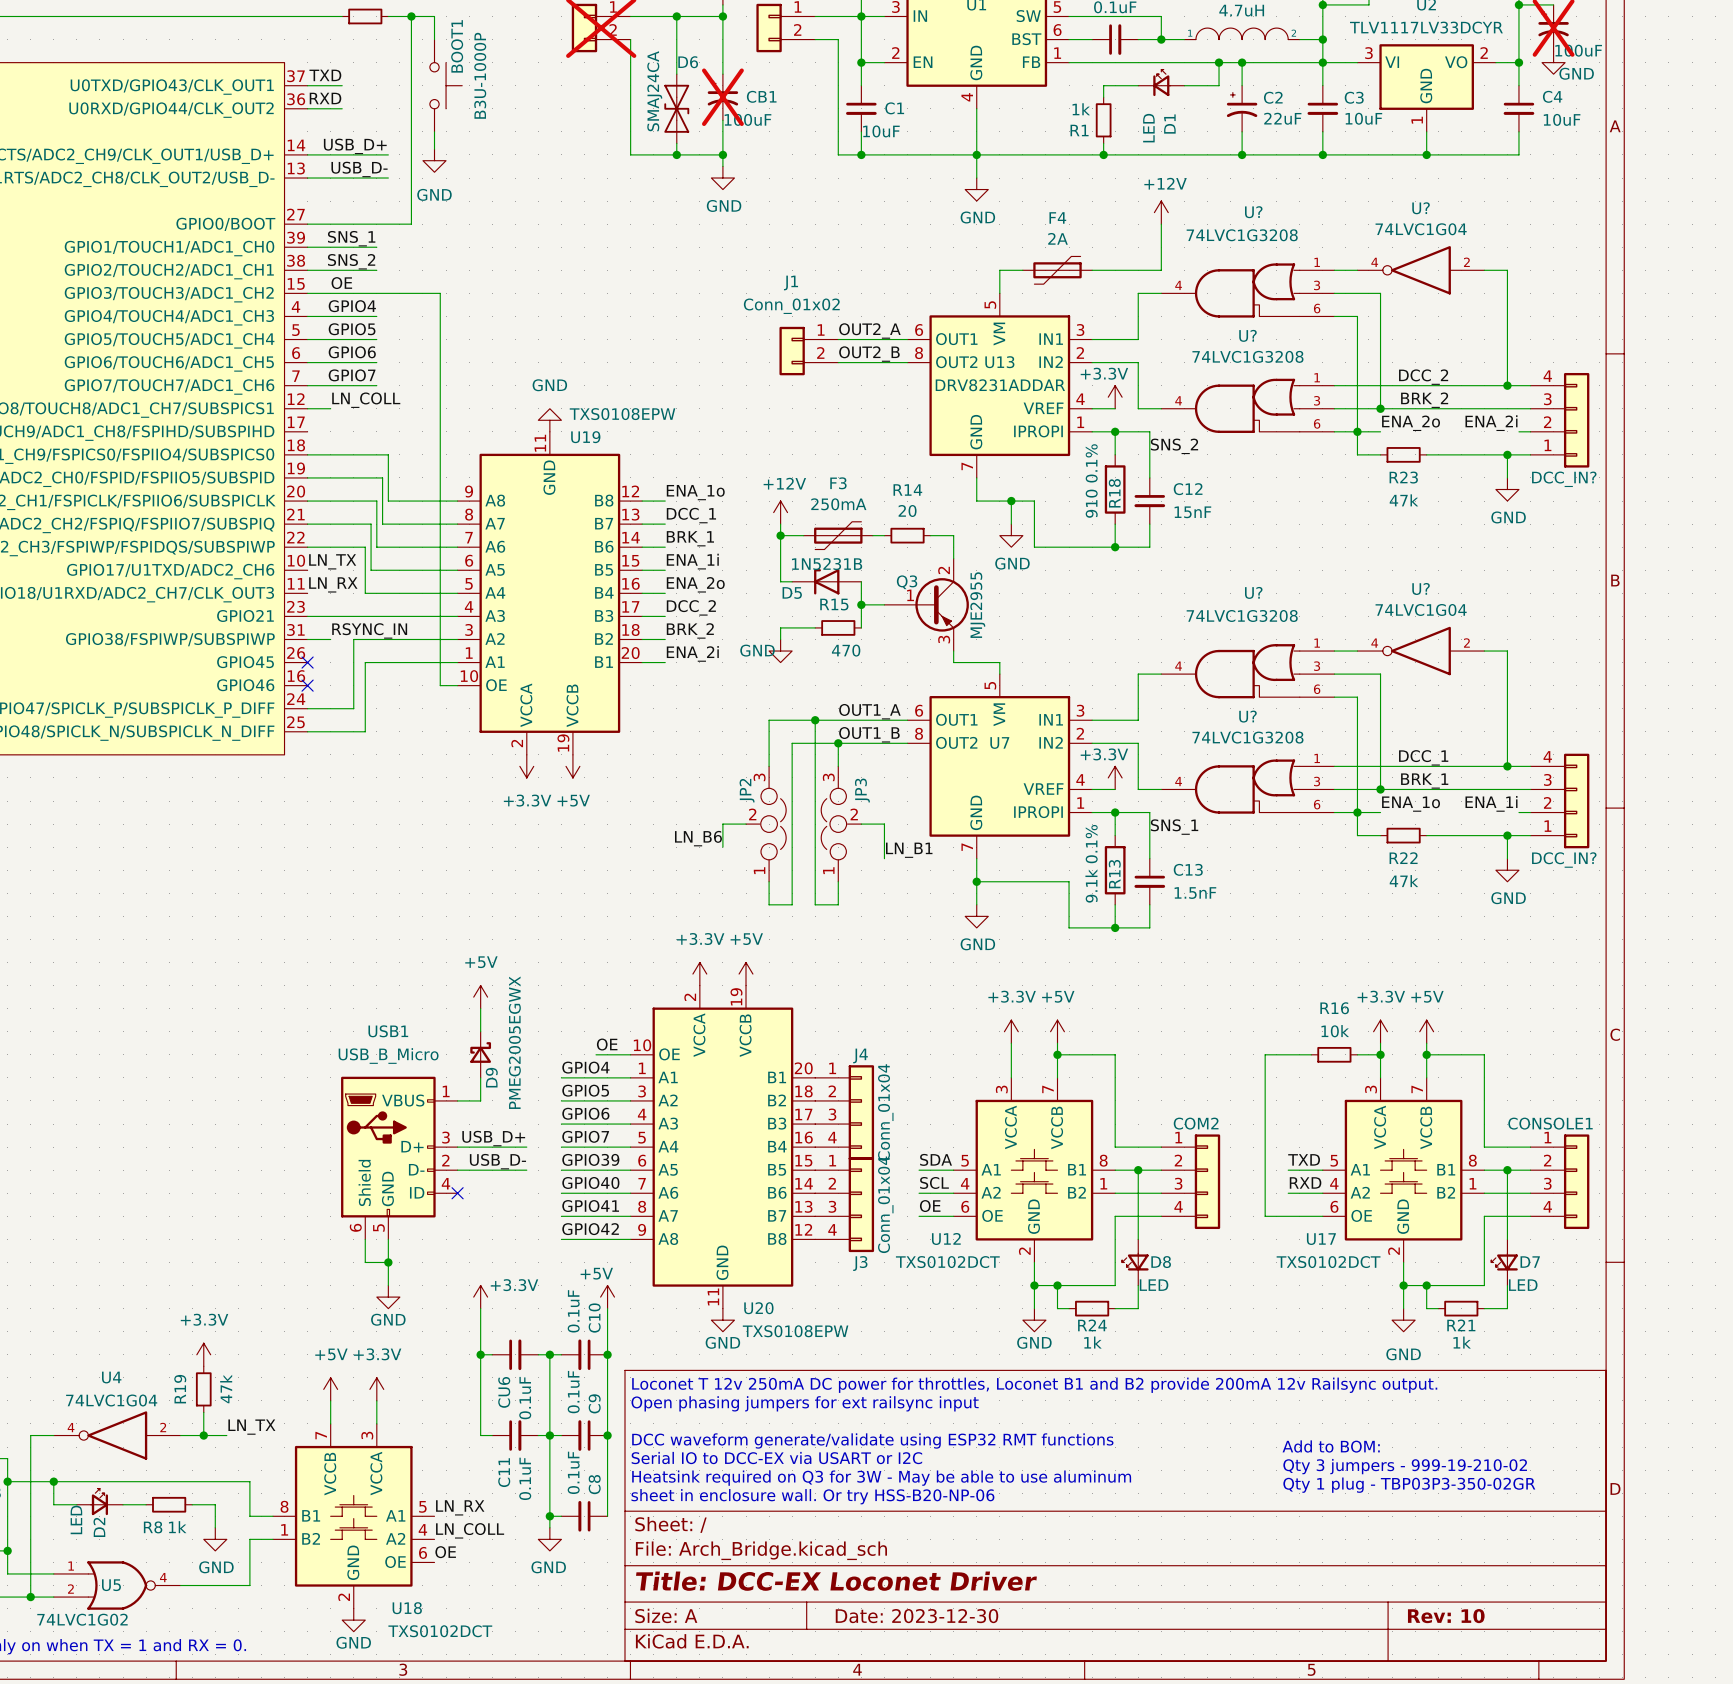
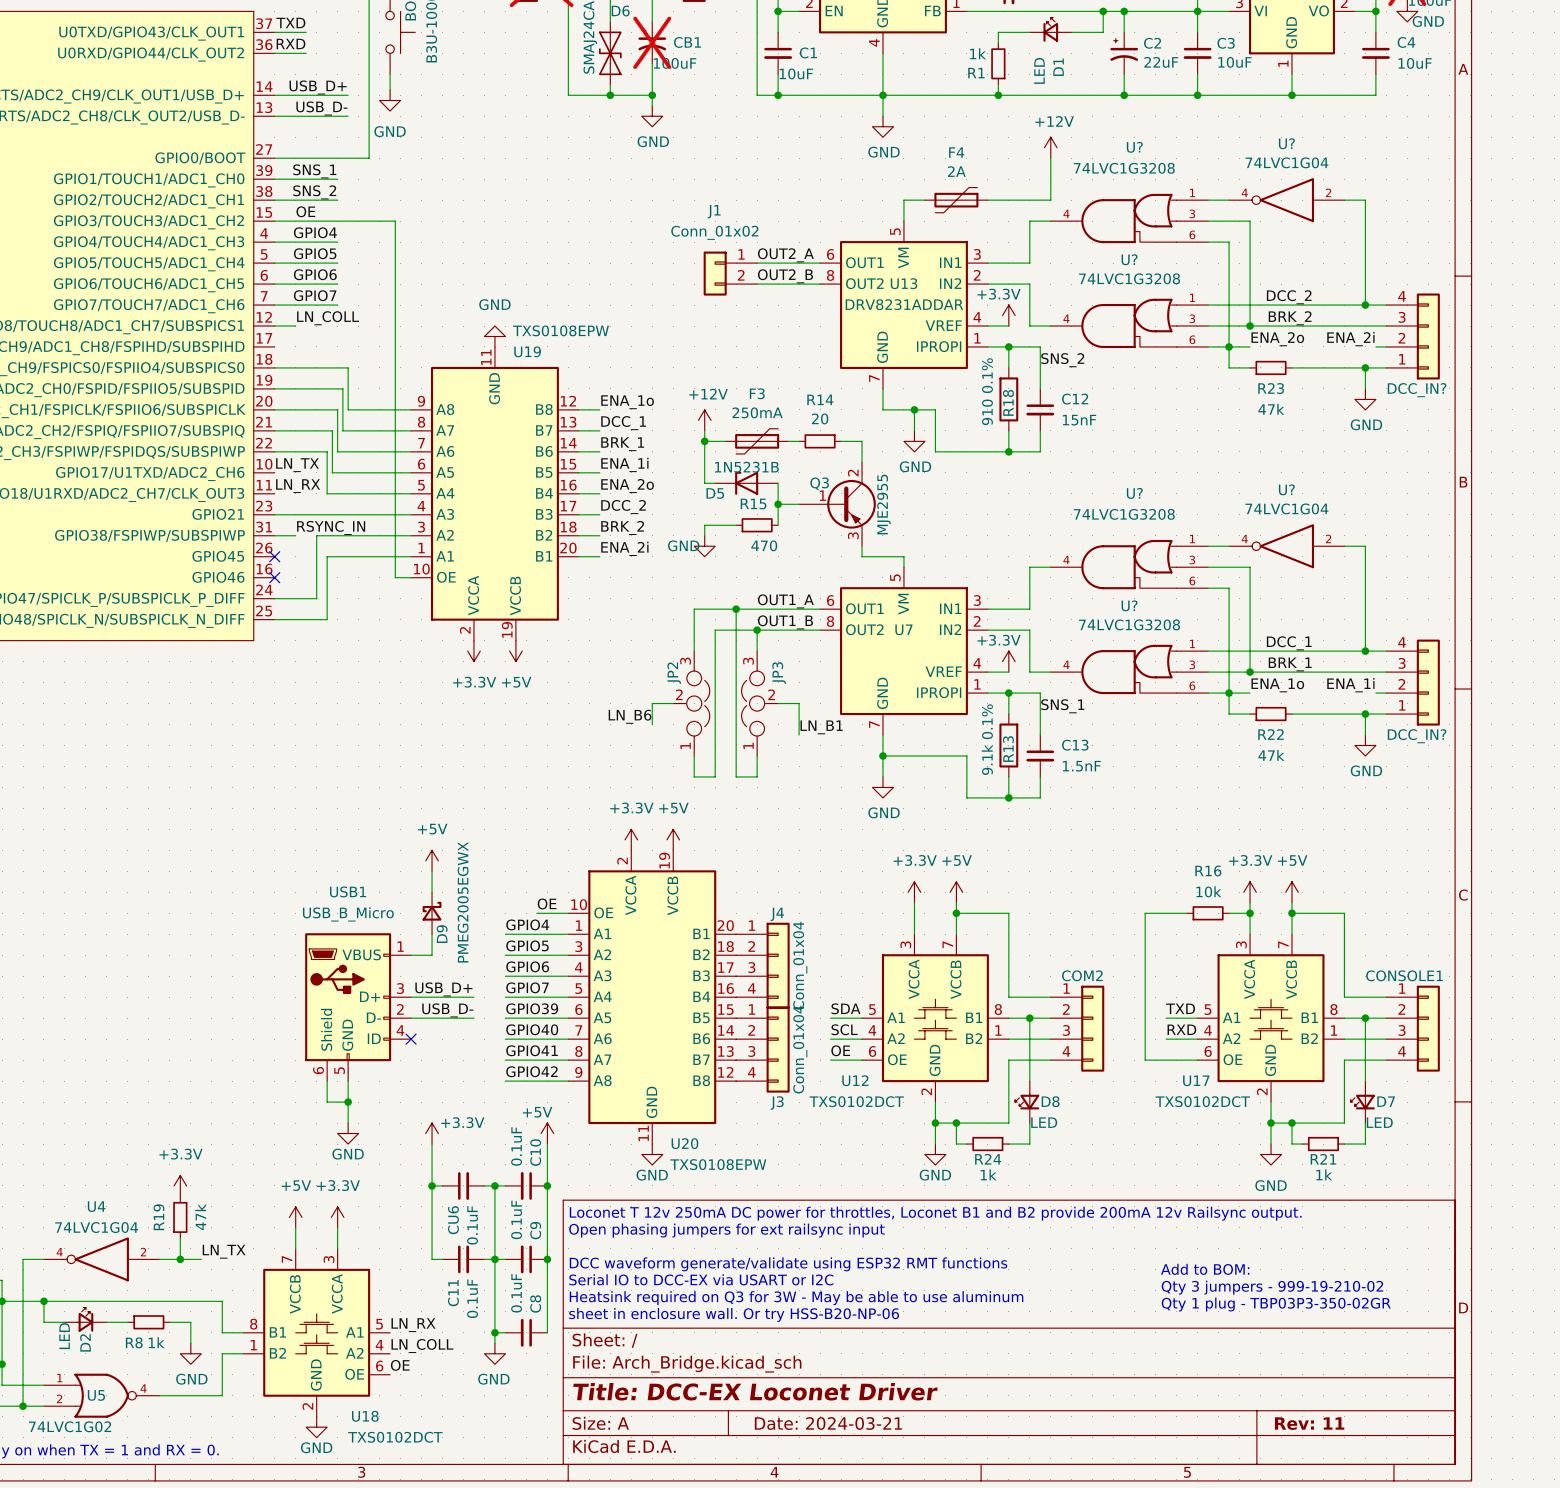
title block: Date: 2023-12-30 (916, 1616) -> Date: 2024-03-21 (828, 1423)
title block: Rev: 10 (1446, 1616) -> Rev: 11 (1309, 1423)

